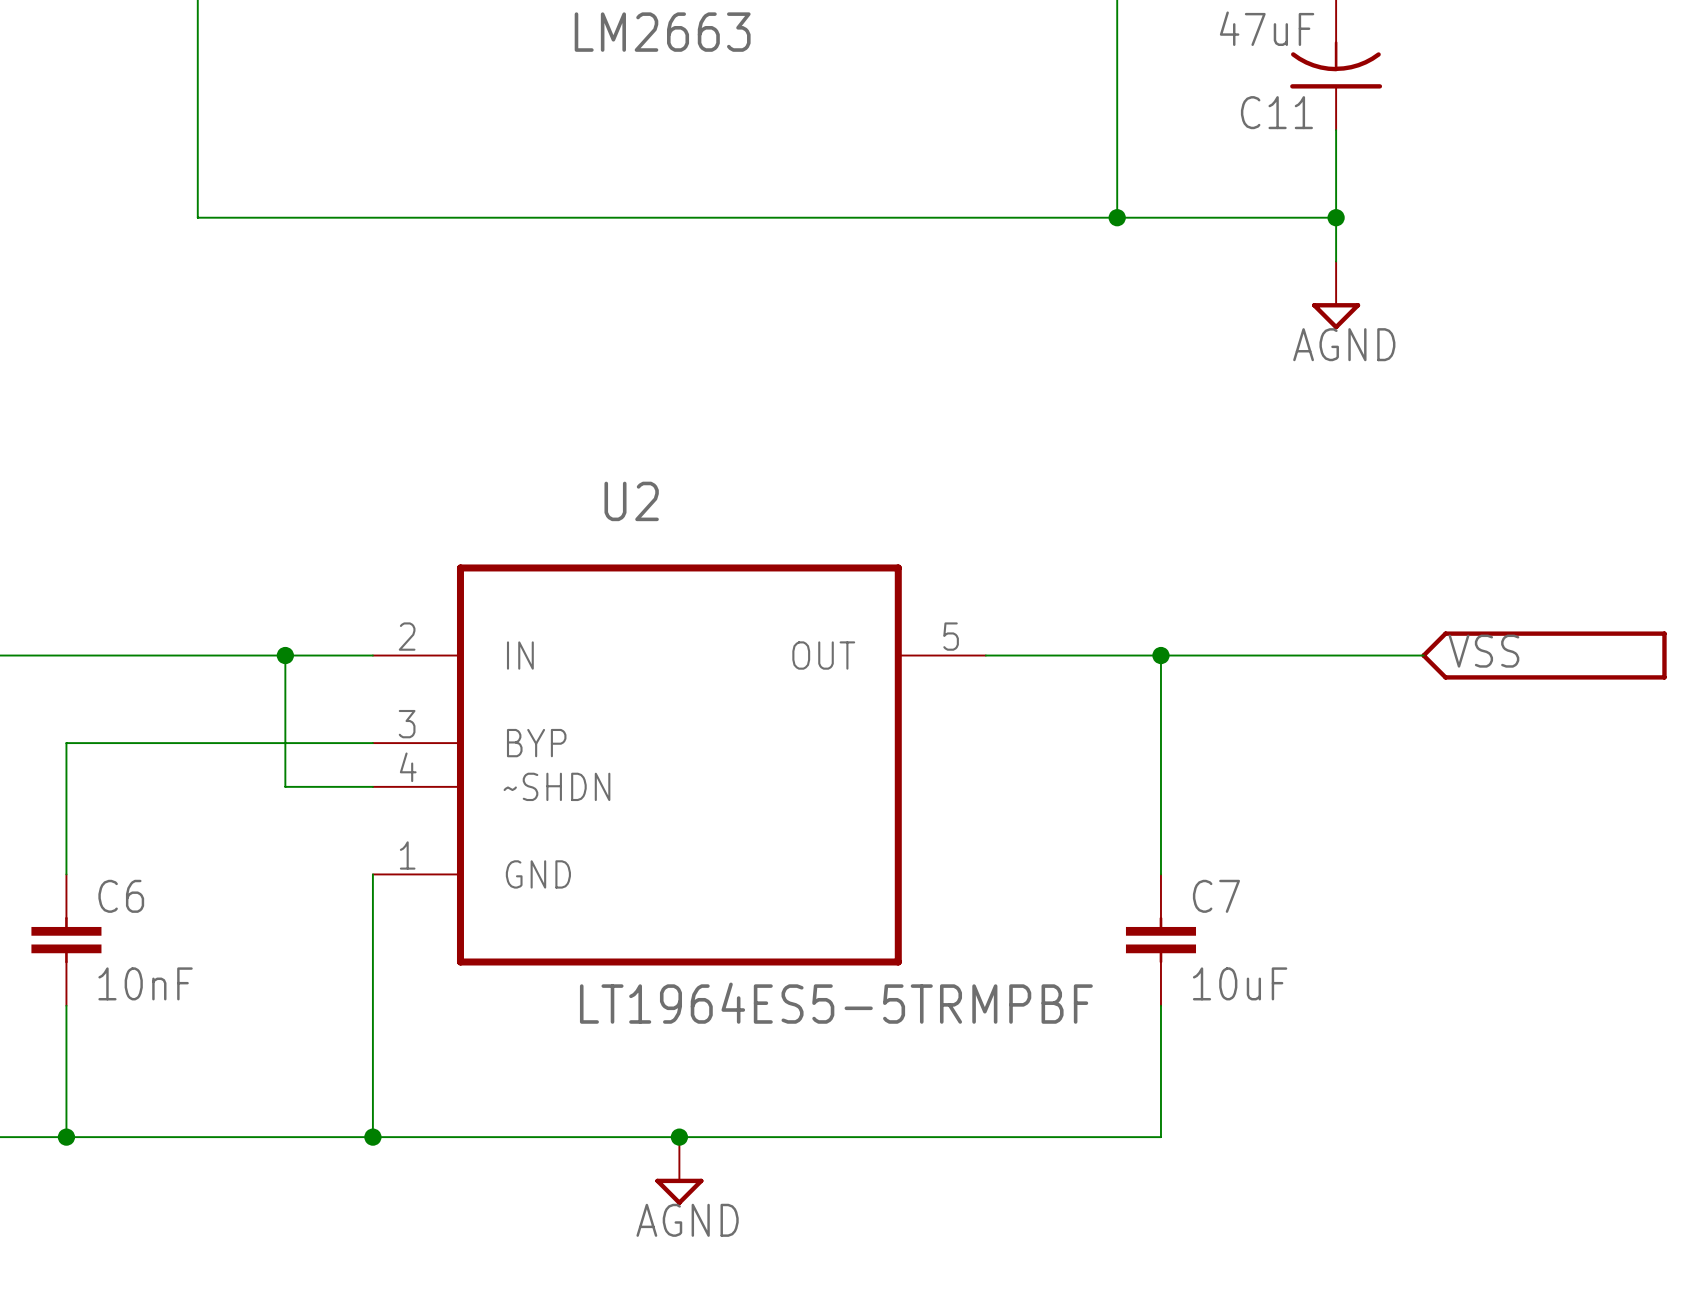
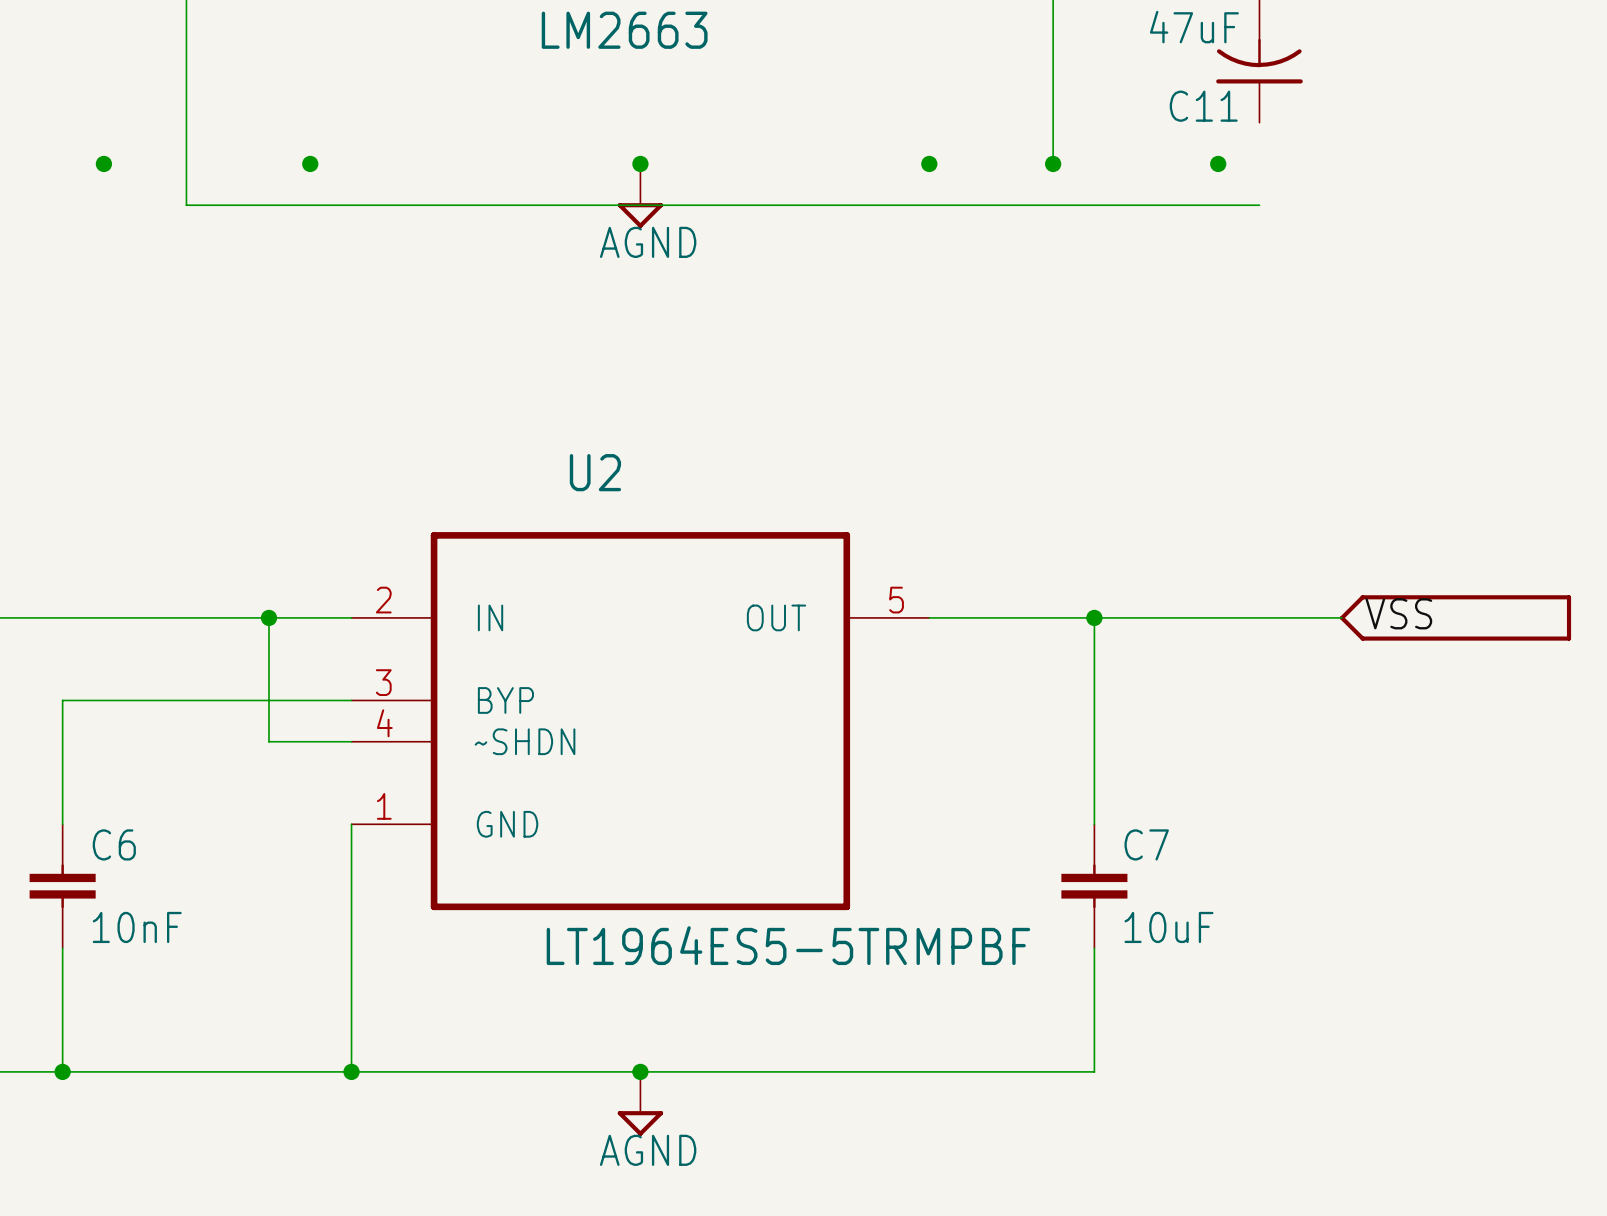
wire: (1336, 130) (1336, 261) -> none
junction: none -> (103, 163)
junction: none -> (310, 163)
junction: none -> (640, 163)
junction: none -> (929, 163)
wire: (1117, 173) (1117, 217) -> none
power symbol: none -> AGND (640, 195)
junction position: (1117, 217) -> (1053, 163)
junction position: (1336, 217) -> (1218, 163)
power symbol: AGND (1336, 295) -> none

